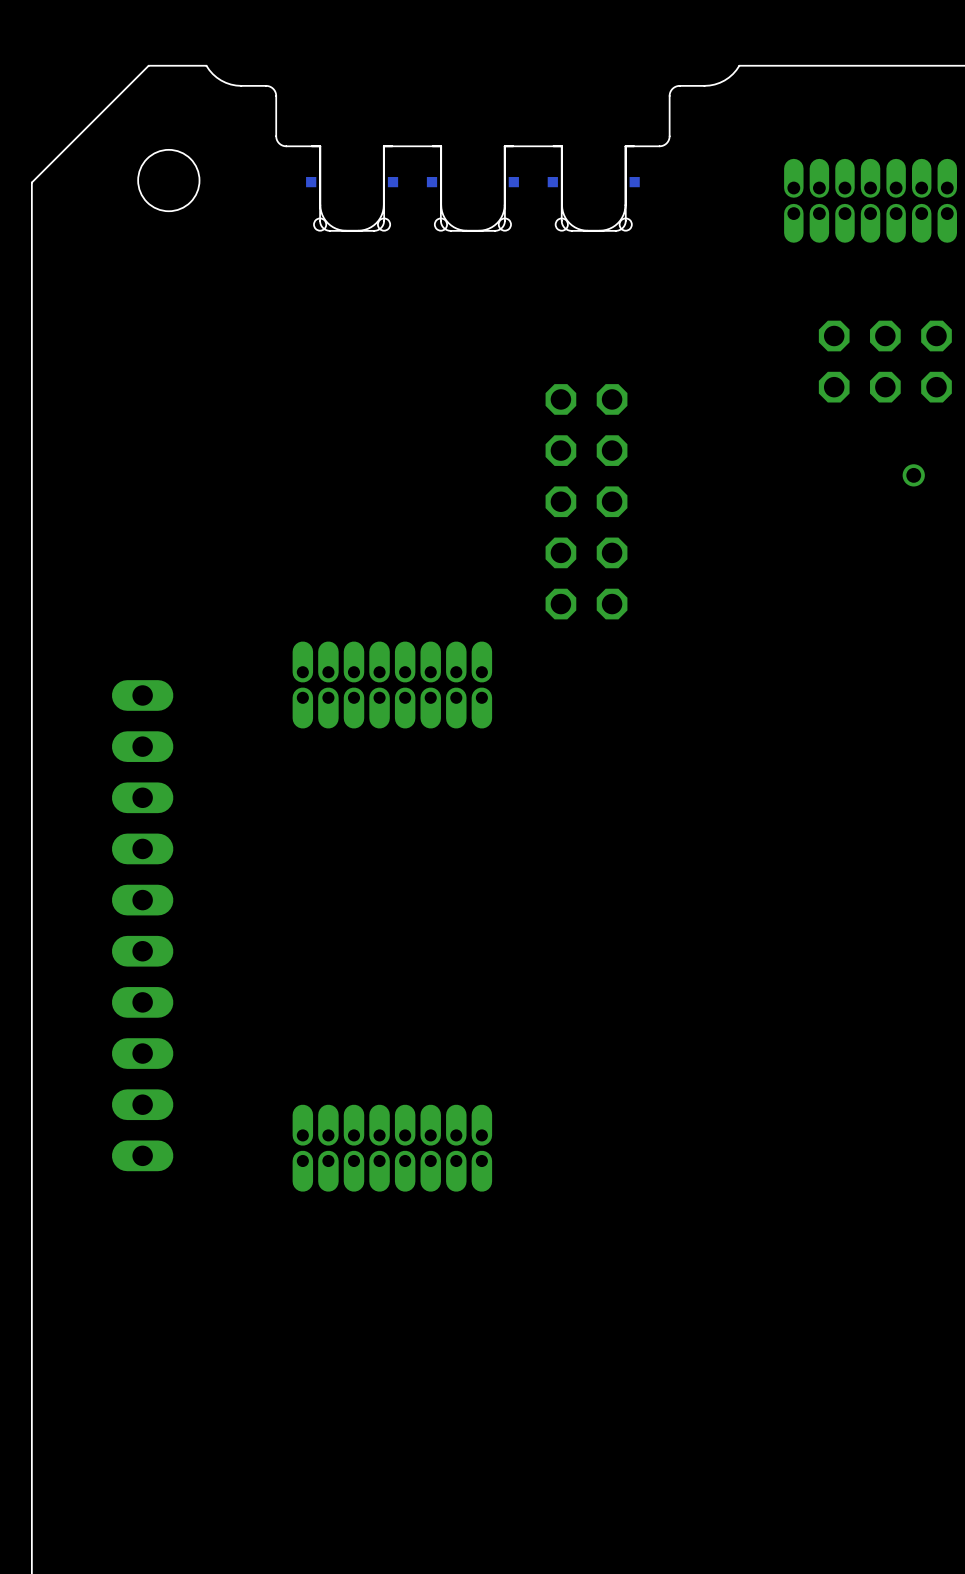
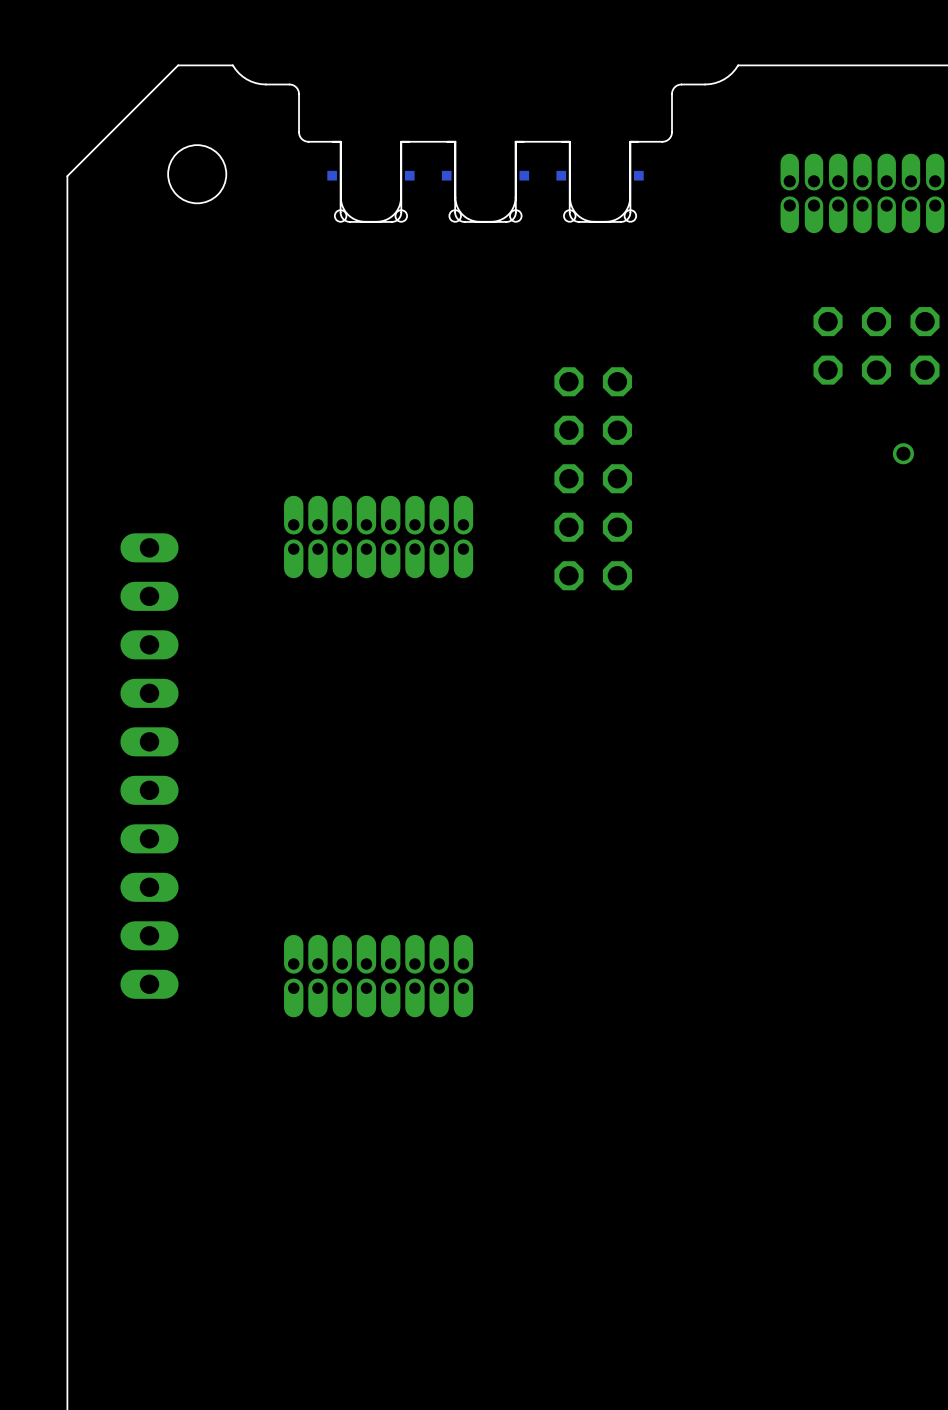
part position: (392, 685) -> (378, 536)
part position: (142, 925) -> (149, 766)
part position: (392, 1148) -> (378, 976)

